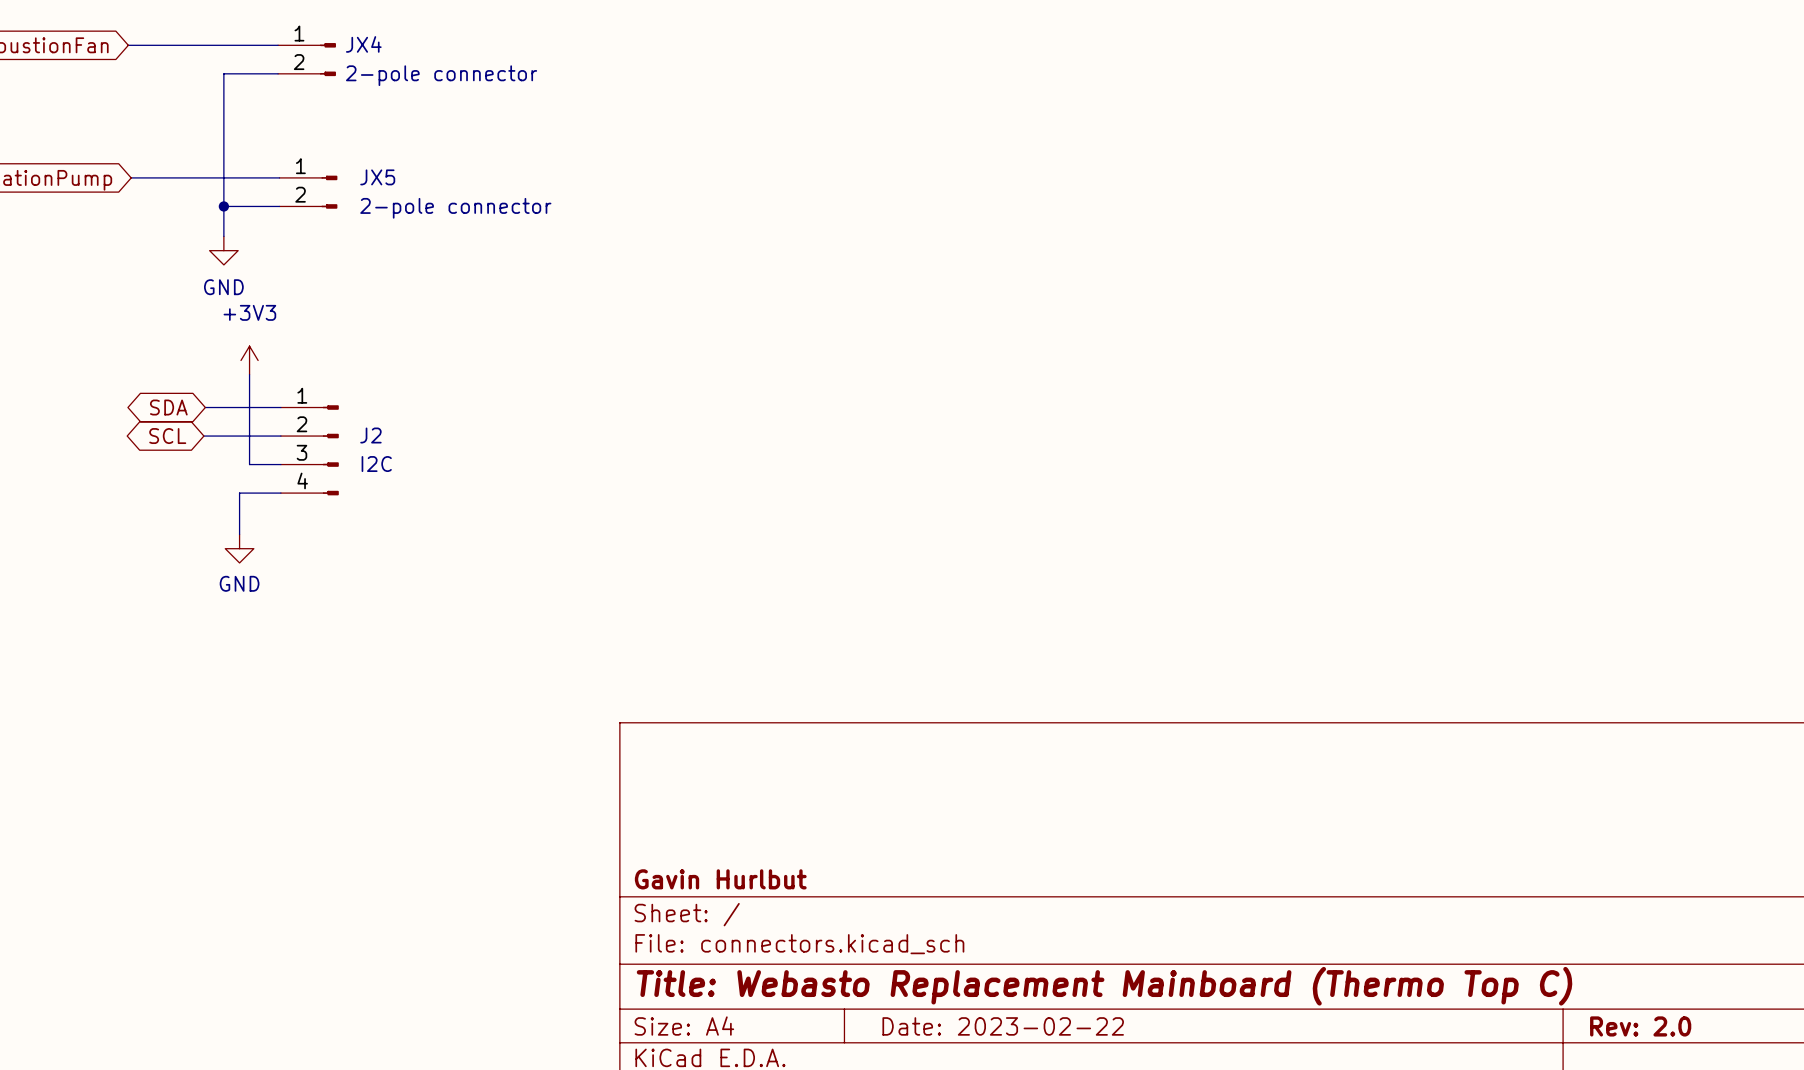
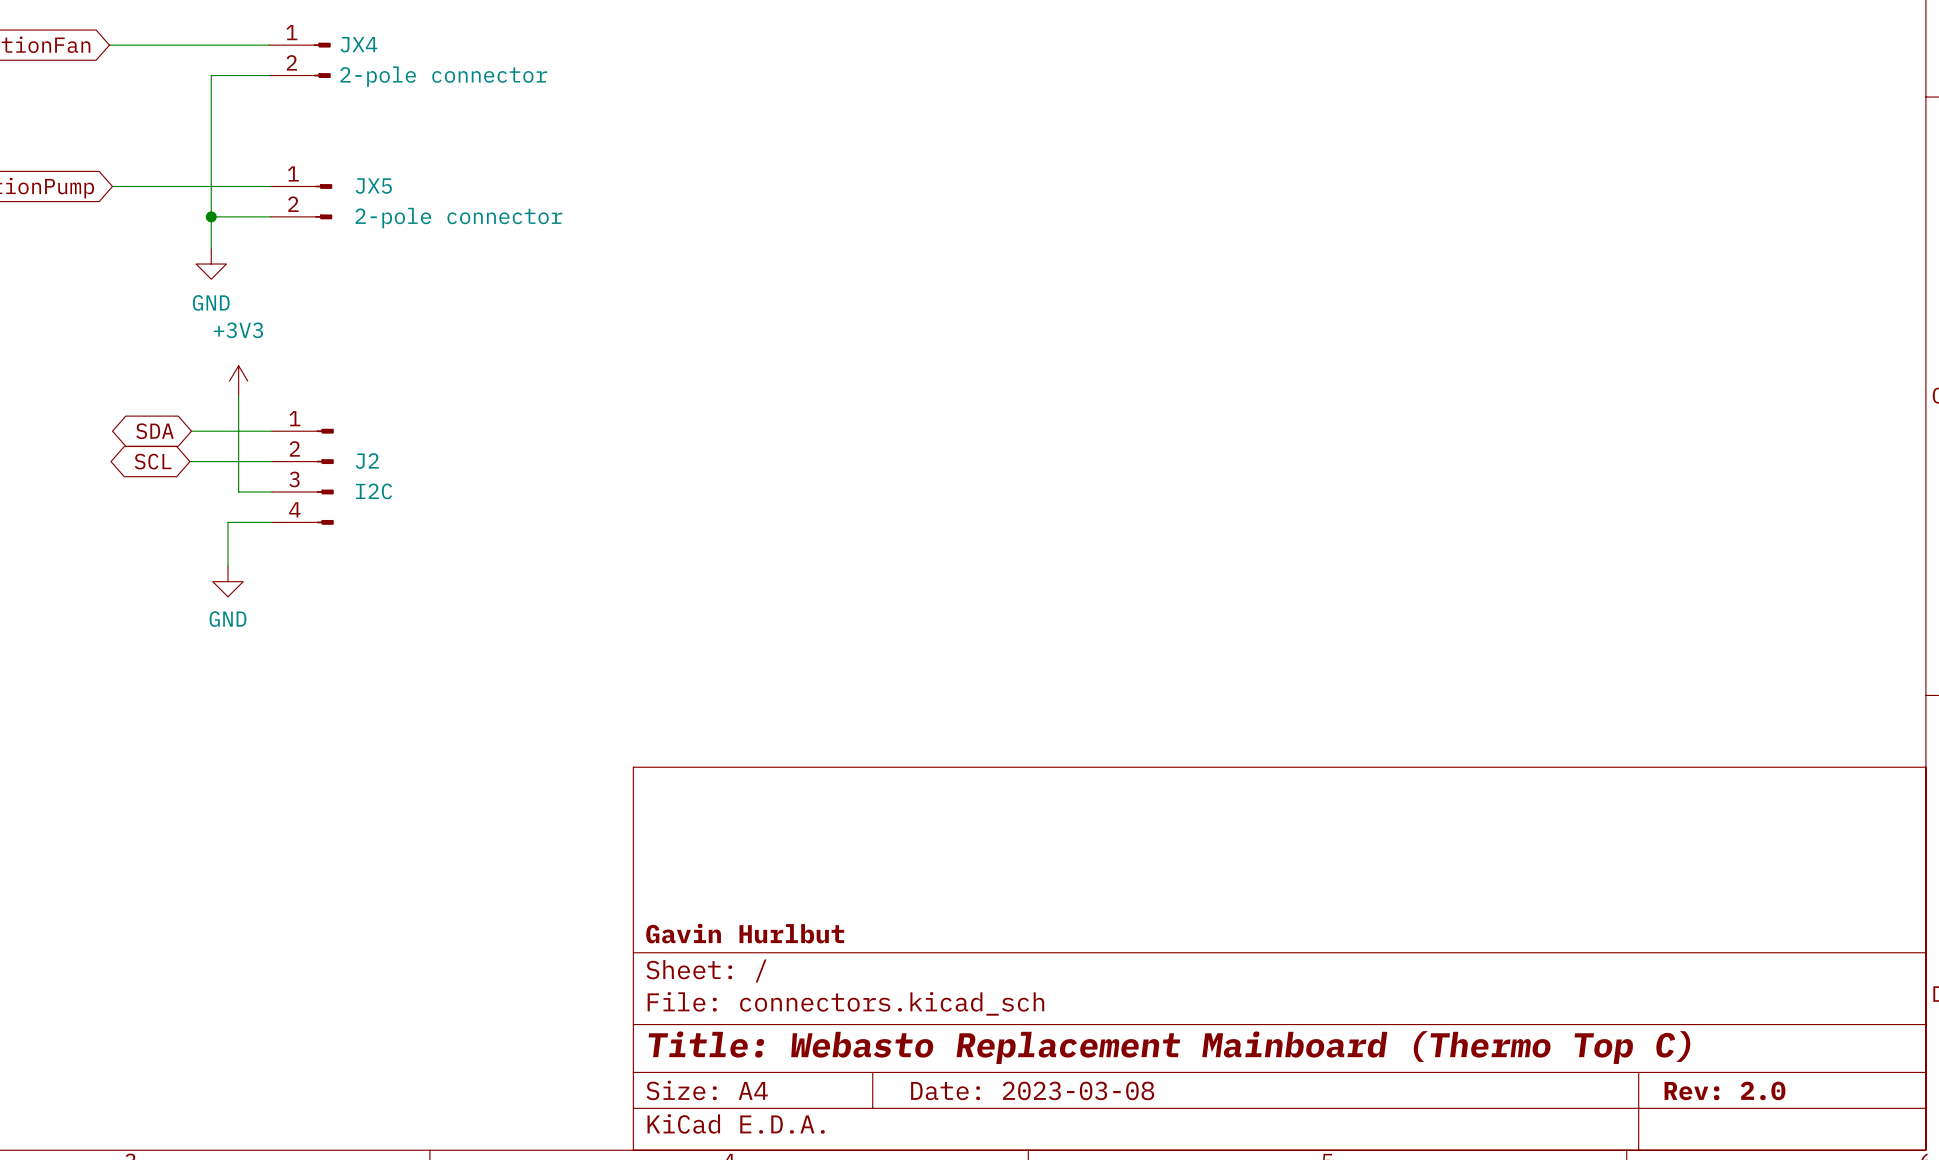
title block: Date: 2023-02-22 (1003, 1026) -> Date: 2023-03-08 (1032, 1090)

